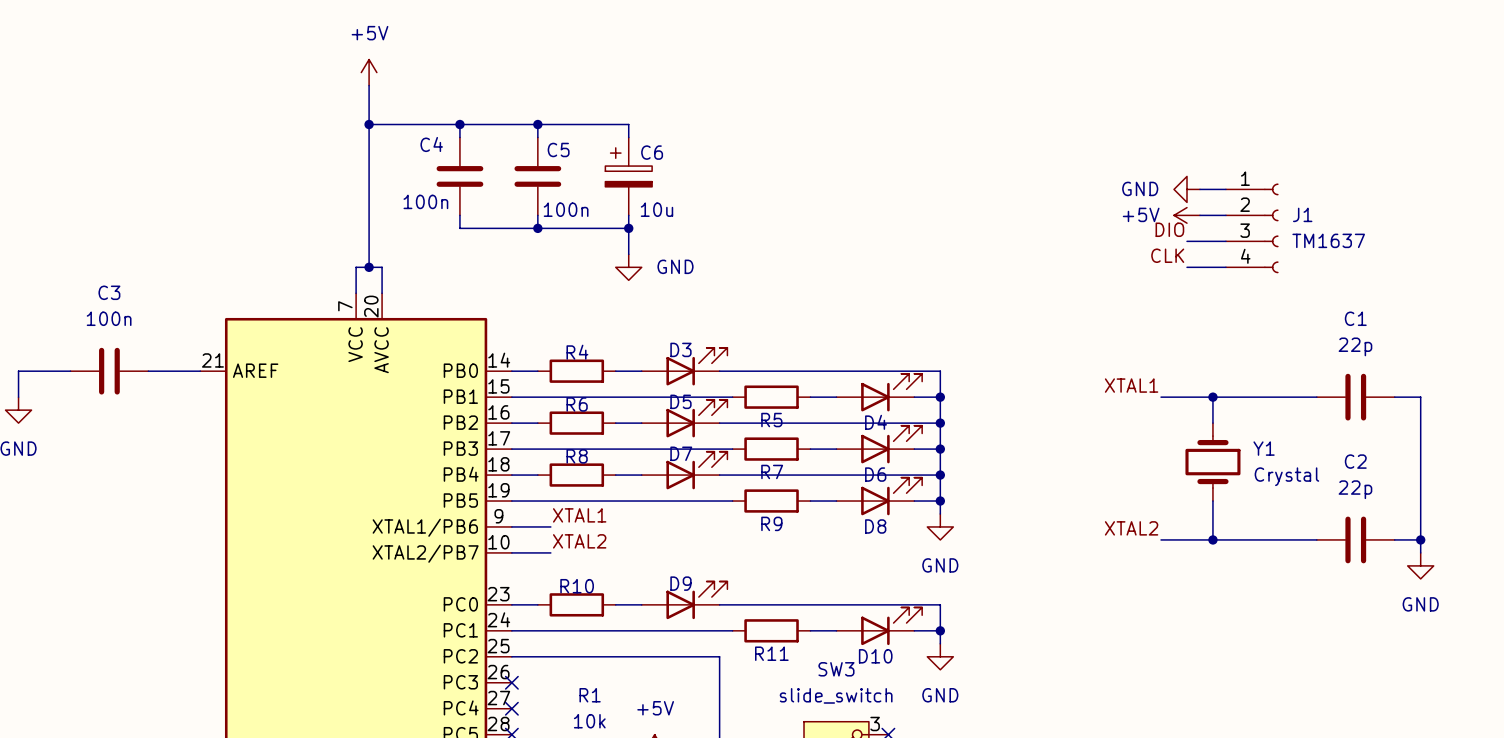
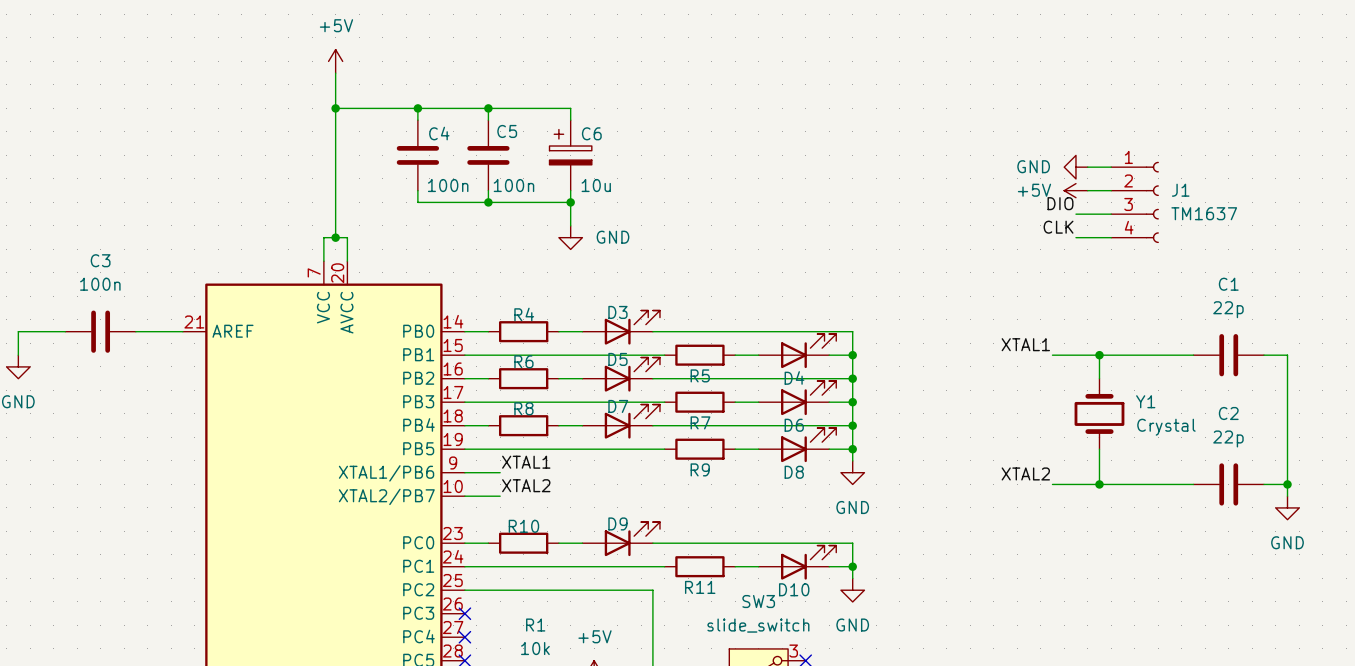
C4 name position: C4 (431, 144) -> C4 (439, 133)
C4 value position: 100n (425, 201) -> 100n (448, 185)

